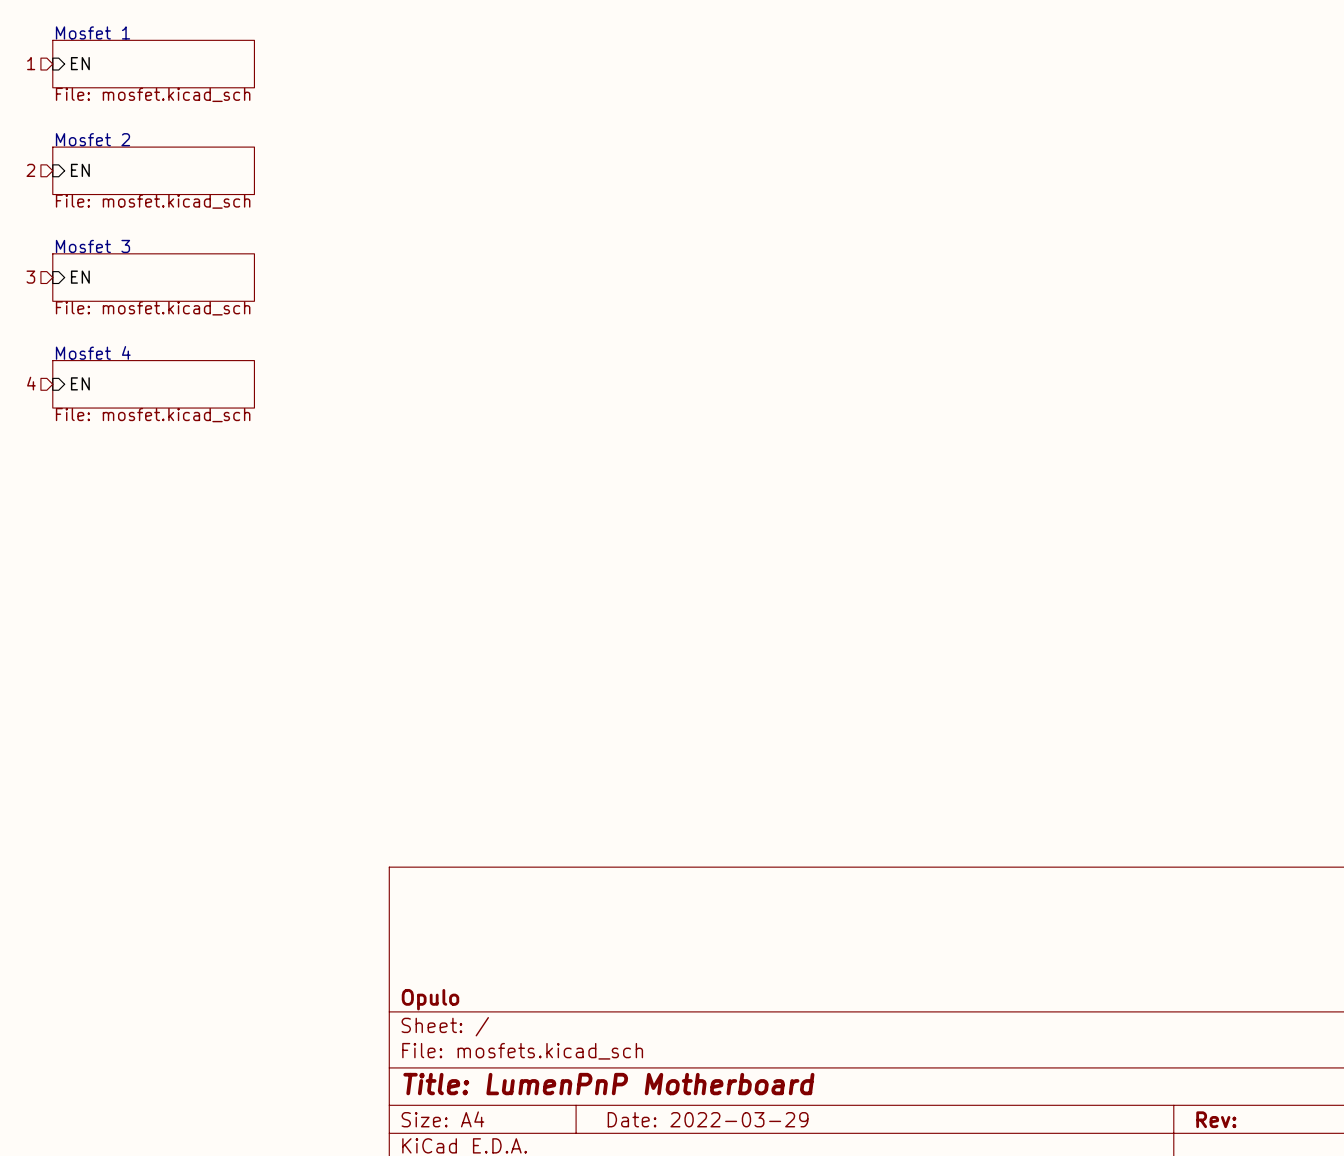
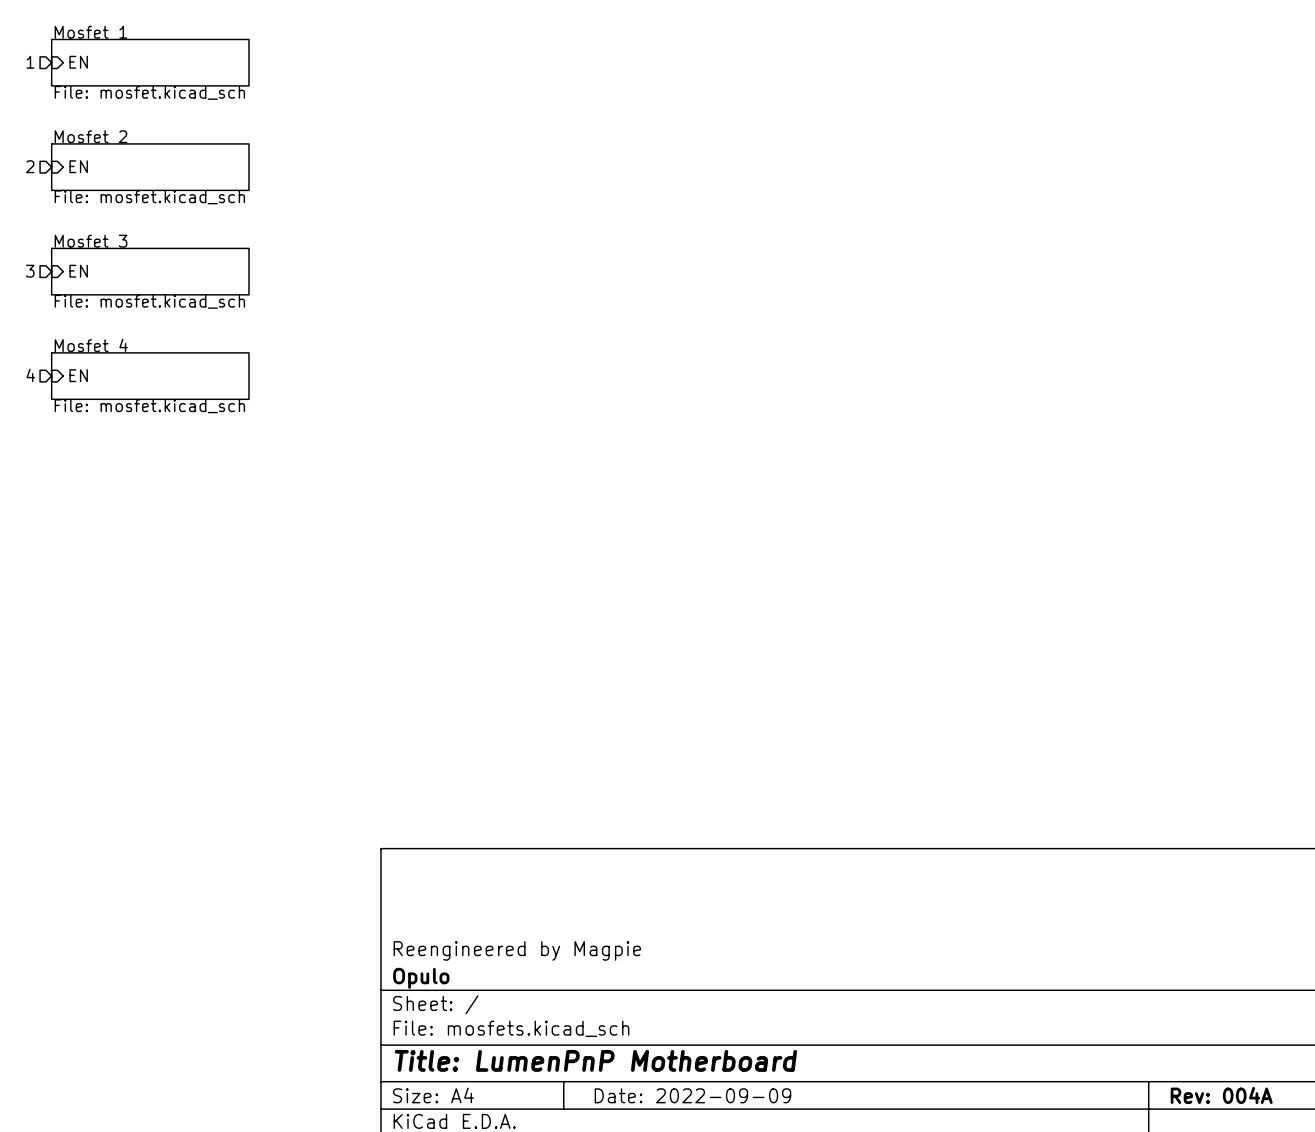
title block: none -> Reengineered by Magpie (517, 950)
title block: Date: 2022-03-29 (708, 1119) -> Date: 2022-09-09 (692, 1095)
title block: Rev: (1216, 1119) -> Rev: 004A (1221, 1095)

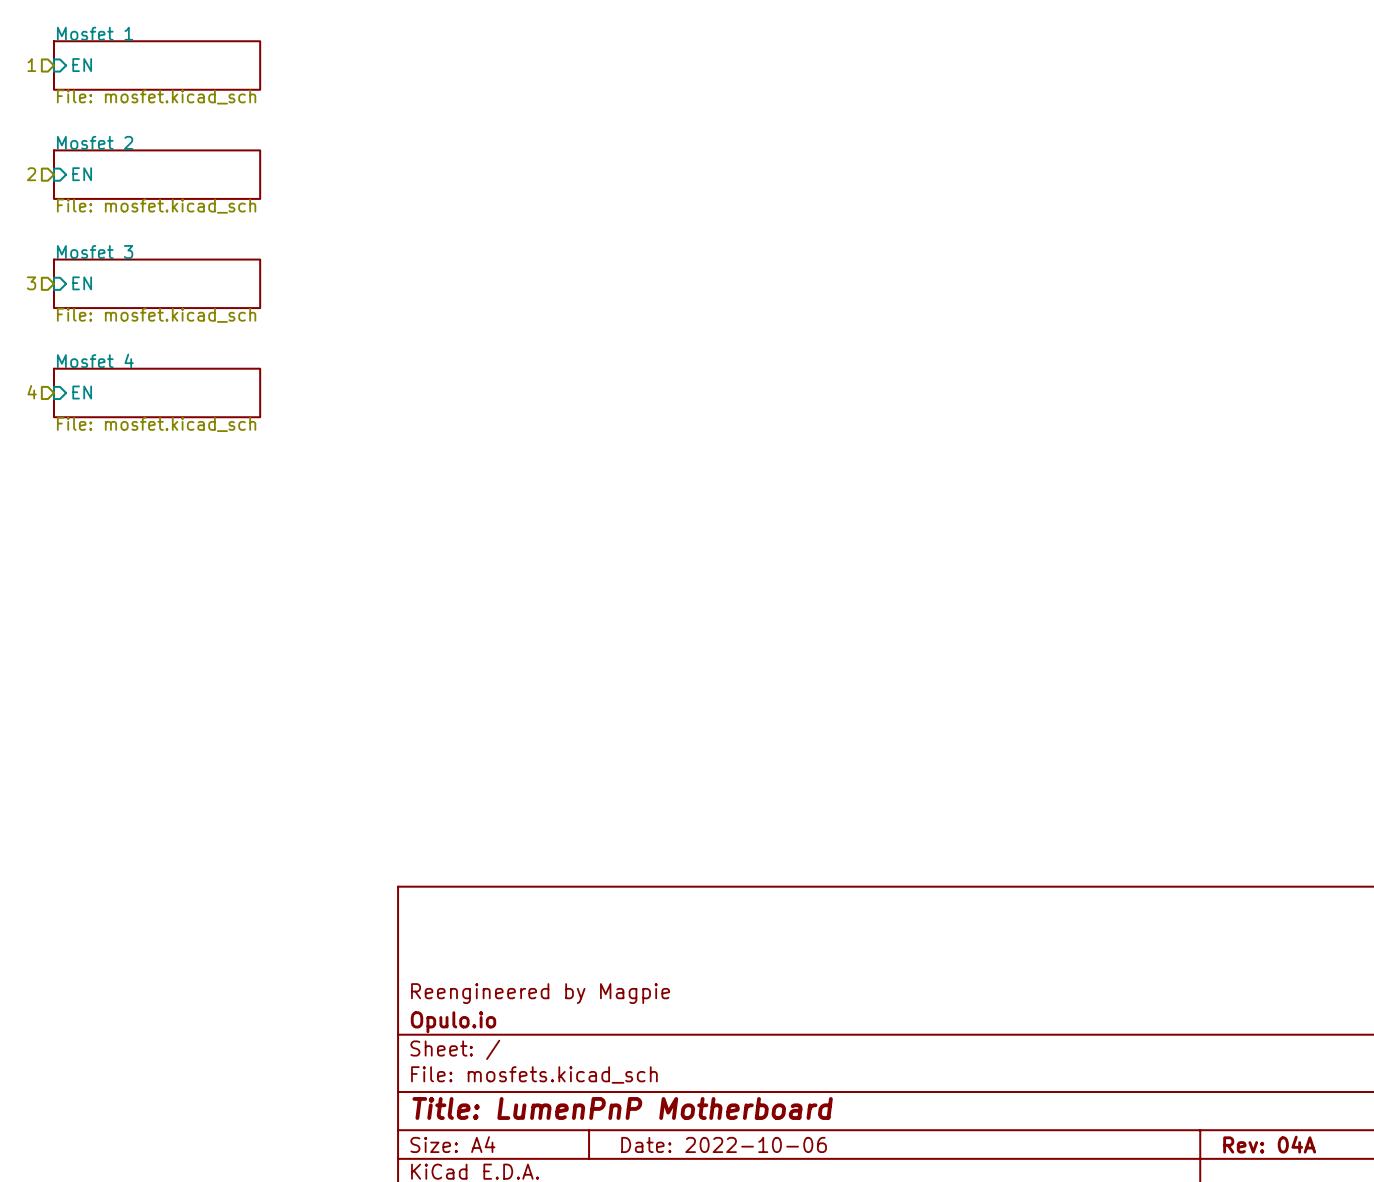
title block: Opulo (421, 978) -> Opulo.io (453, 1022)
title block: Date: 2022-09-09 (692, 1095) -> Date: 2022-10-06 (724, 1144)
title block: Rev: 004A (1221, 1095) -> Rev: 04A (1269, 1144)

